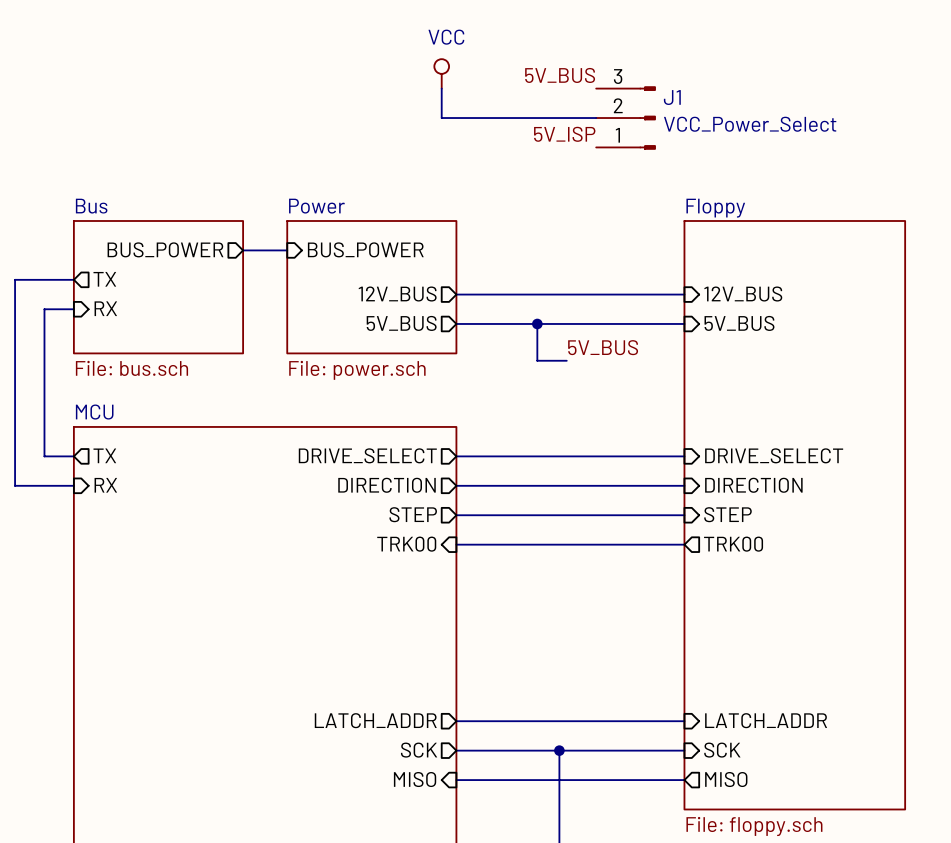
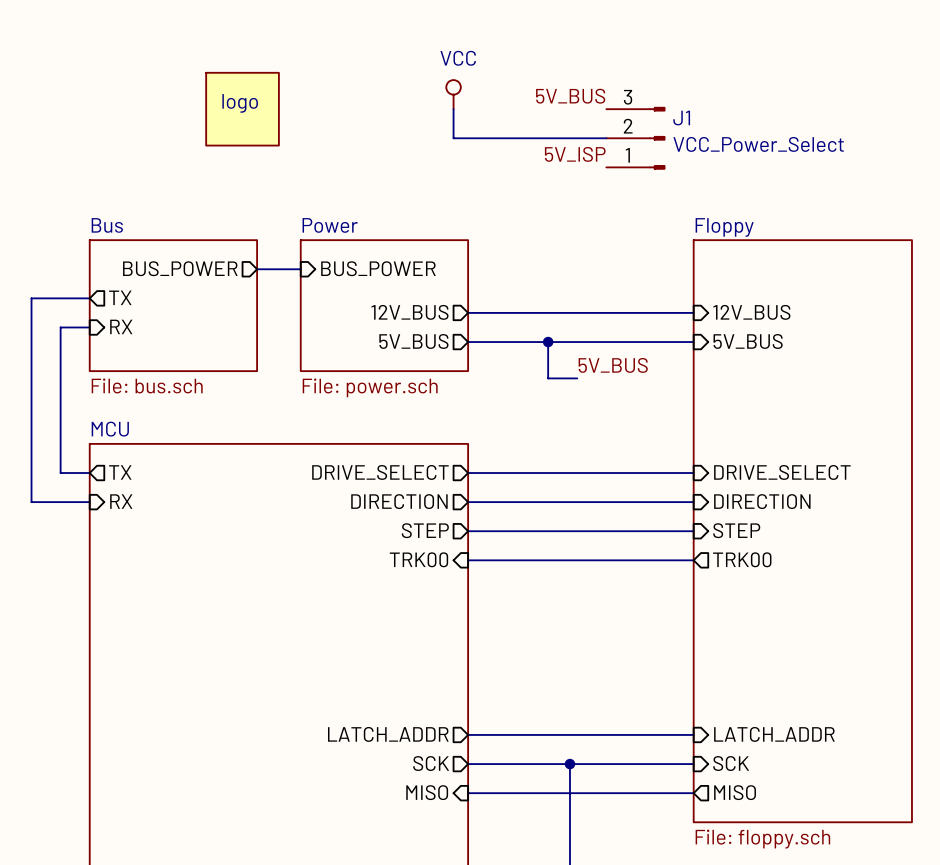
part: none -> logo (242, 109)

